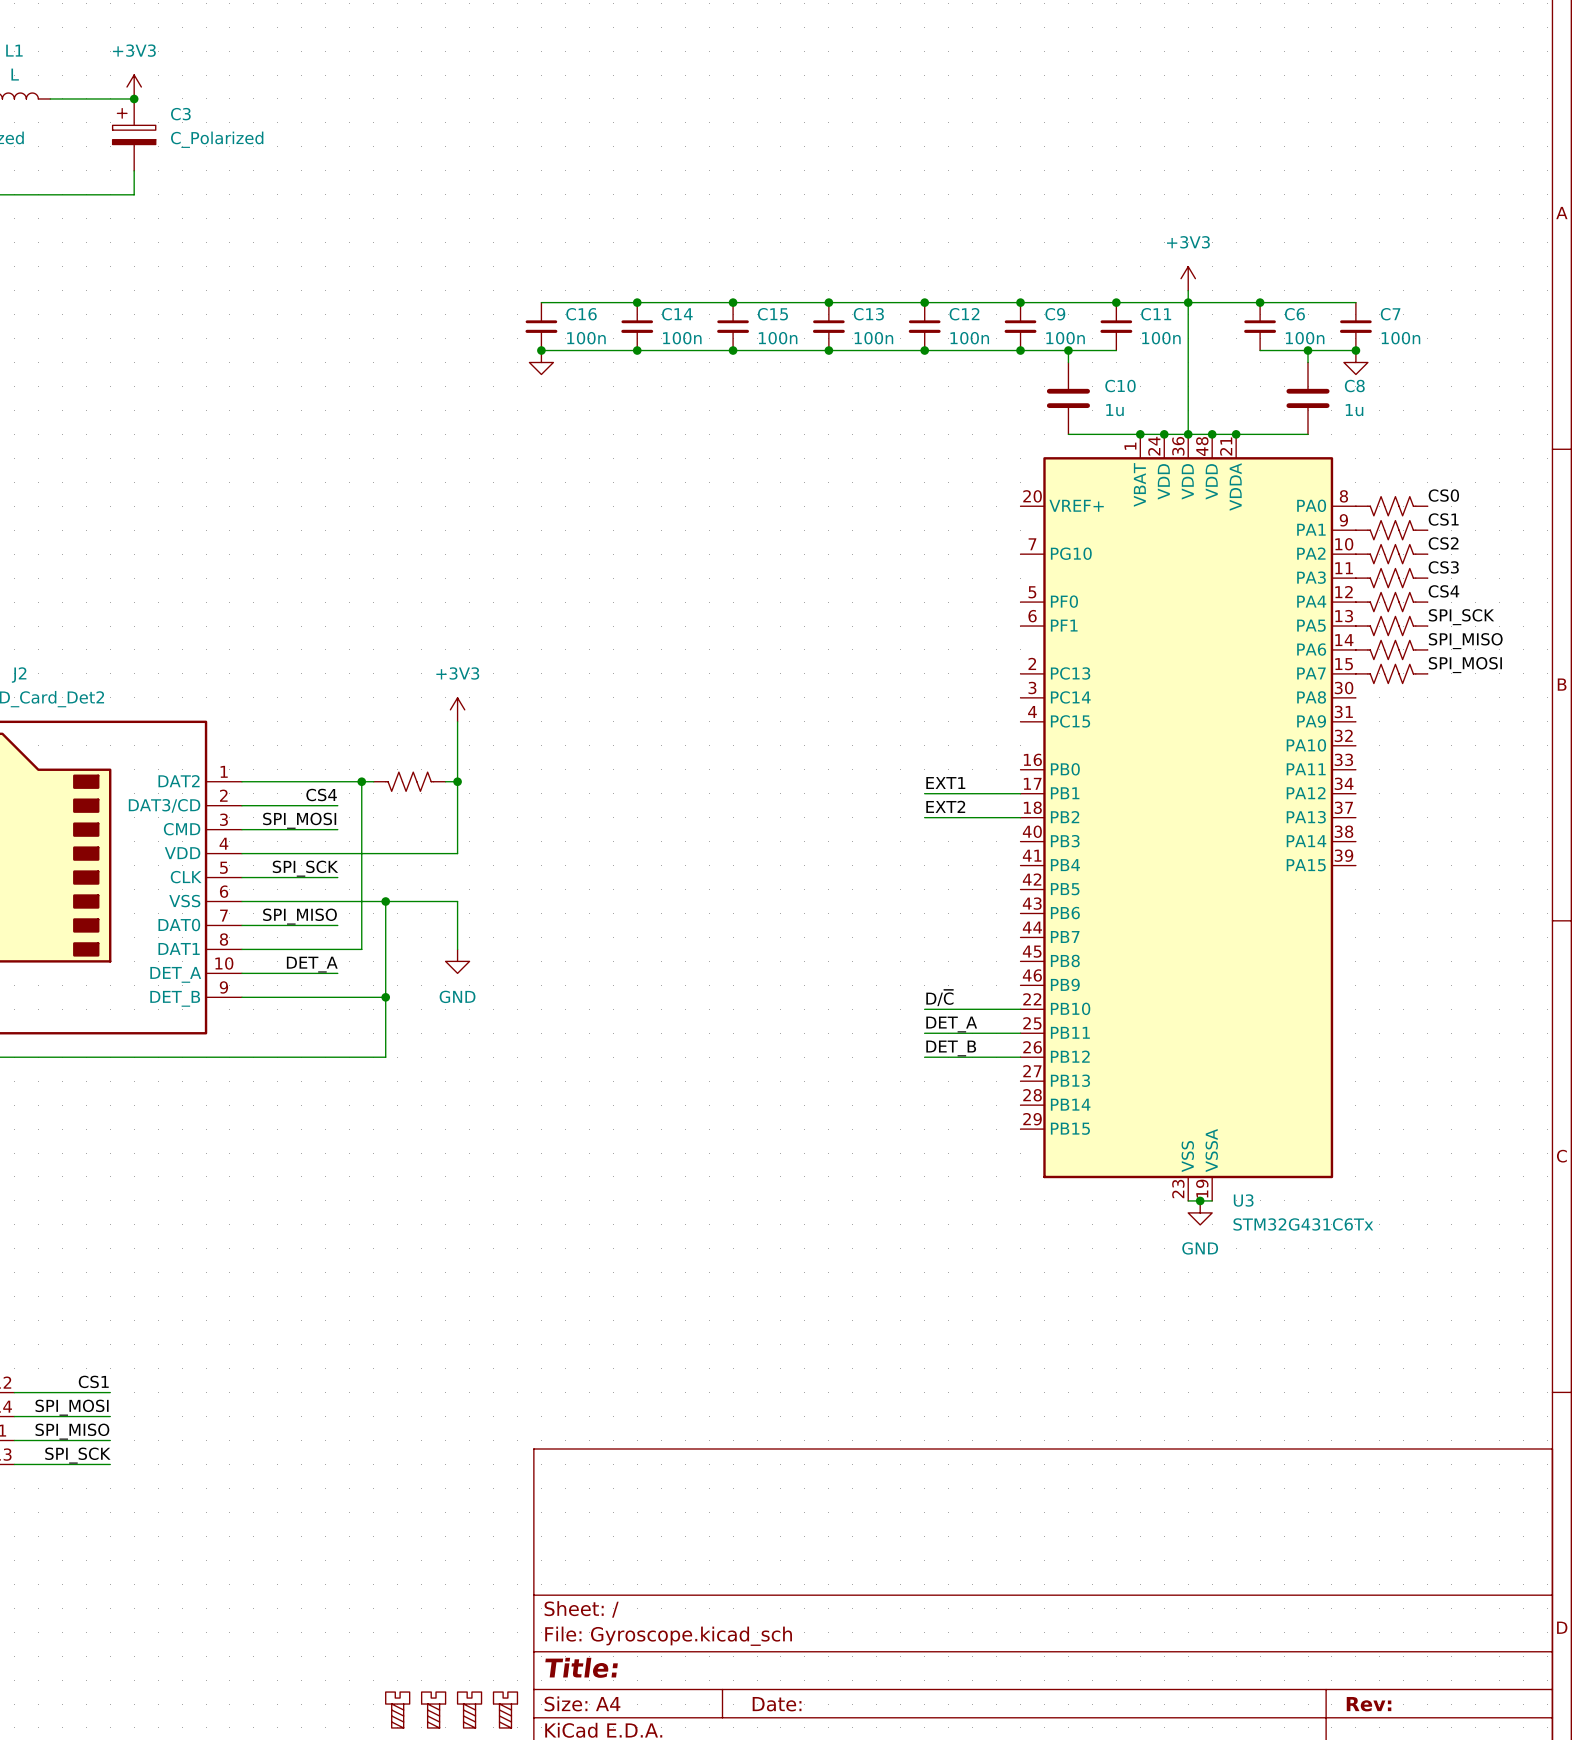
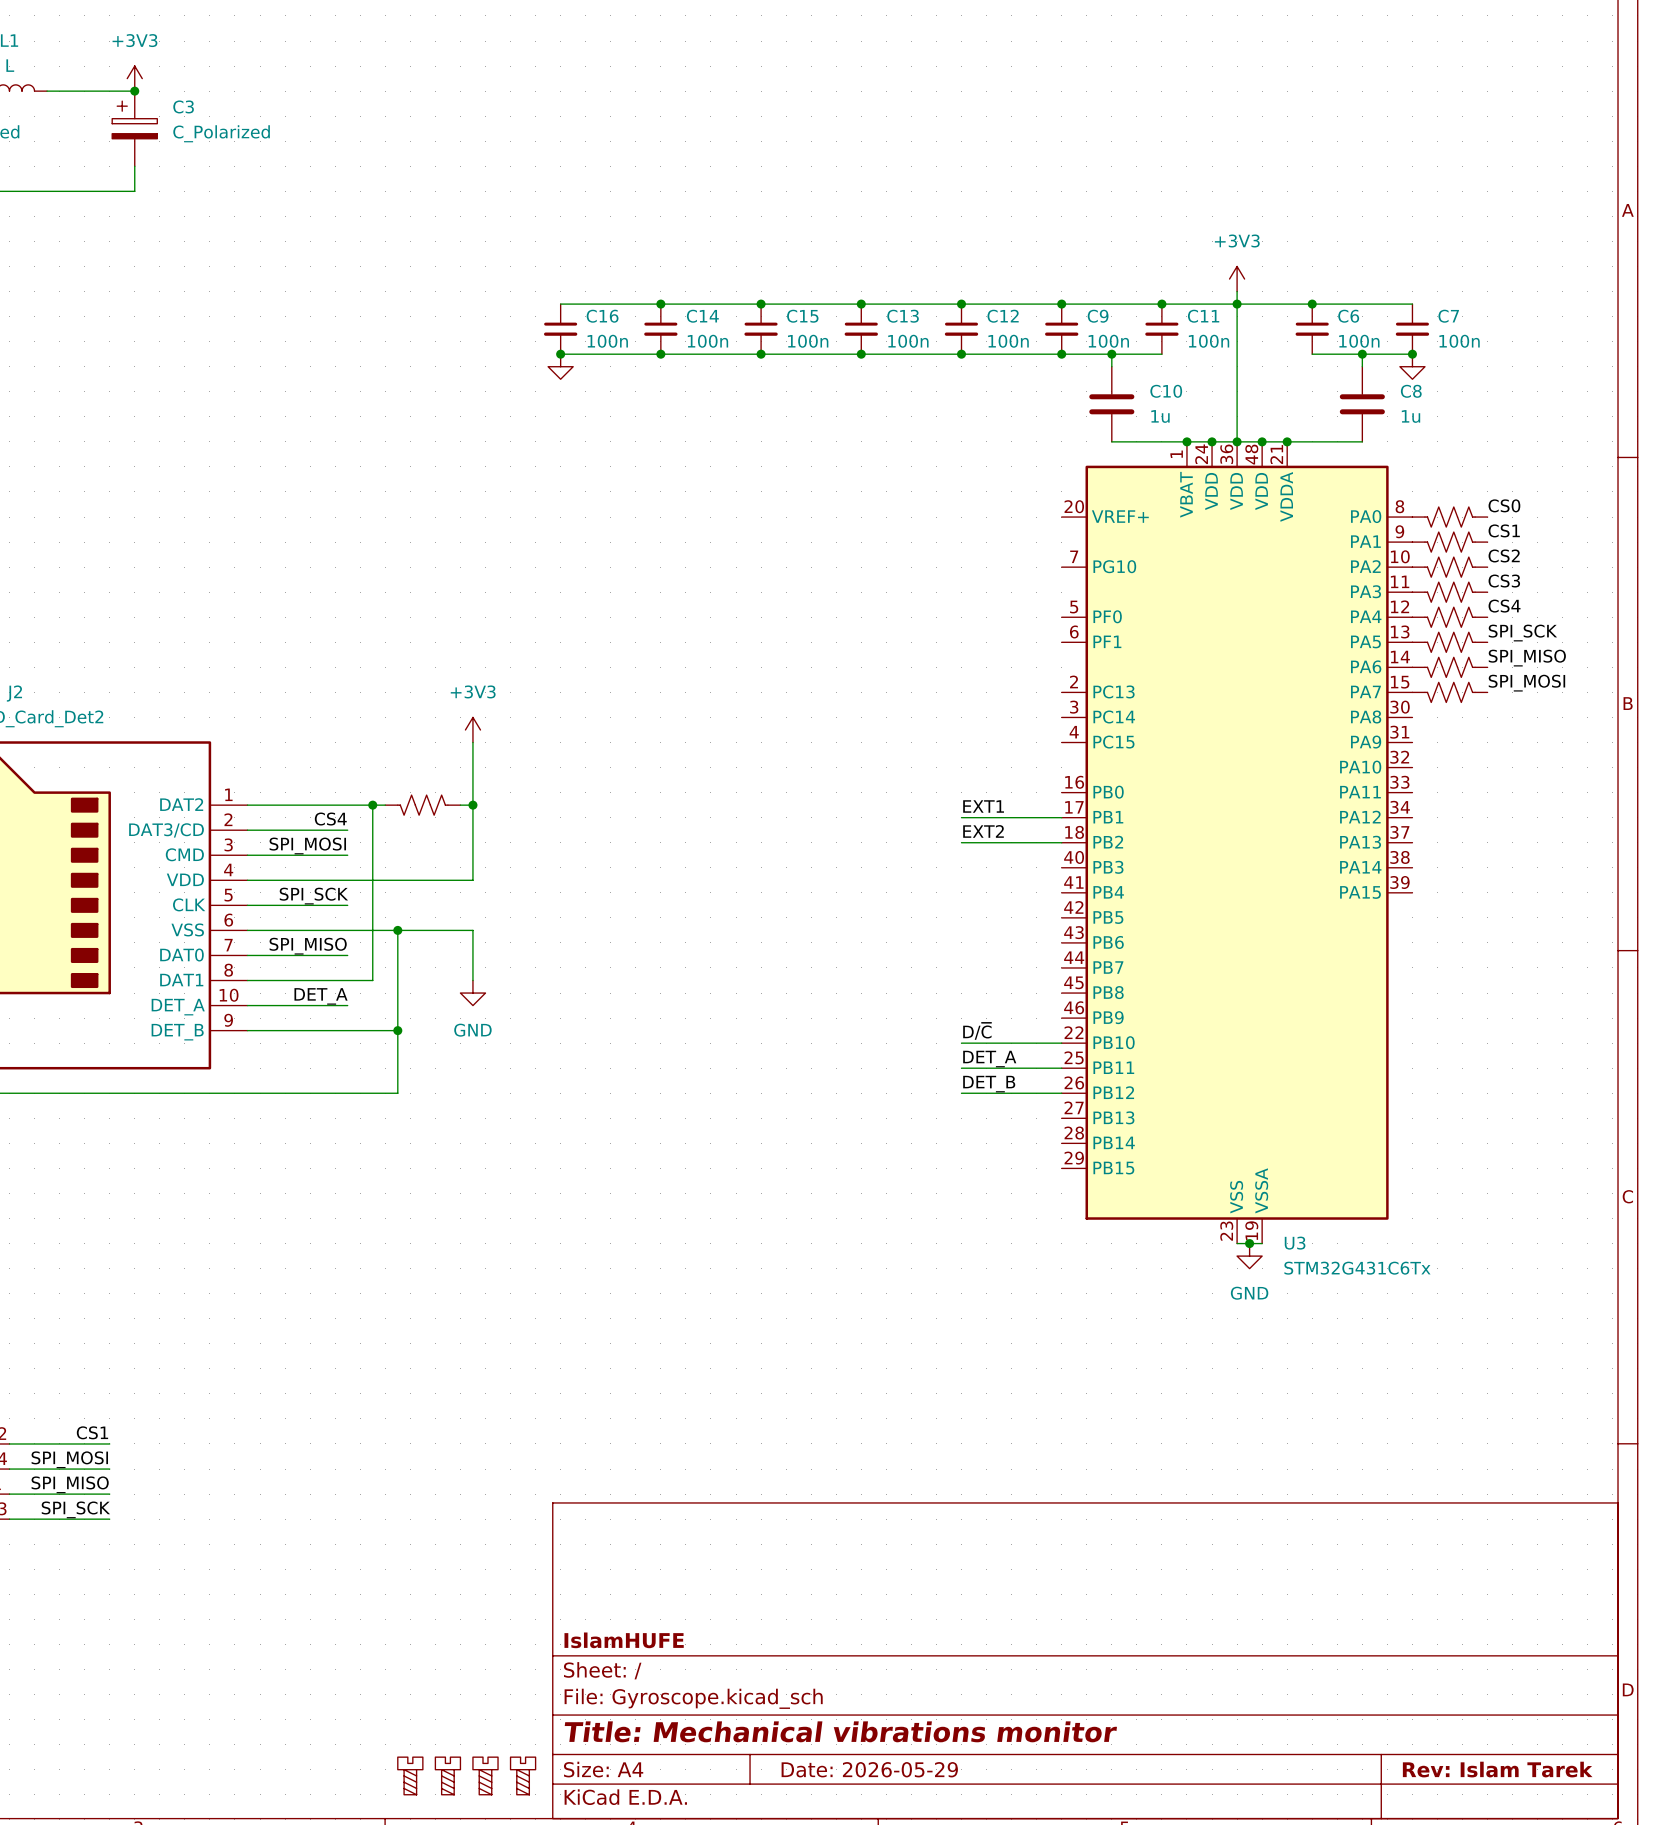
title block: none -> IslamHUFE (624, 1640)
title block: Title: (581, 1667) -> Title: Mechanical vibrations monitor (840, 1731)
title block: Date: (777, 1704) -> Date: 2026-05-29 (869, 1769)
title block: Rev: (1369, 1704) -> Rev: Islam Tarek (1497, 1769)

